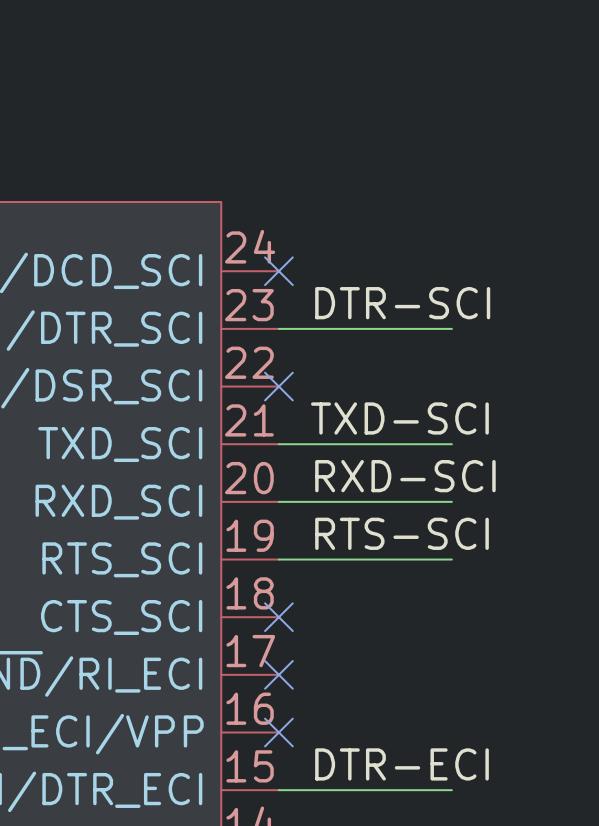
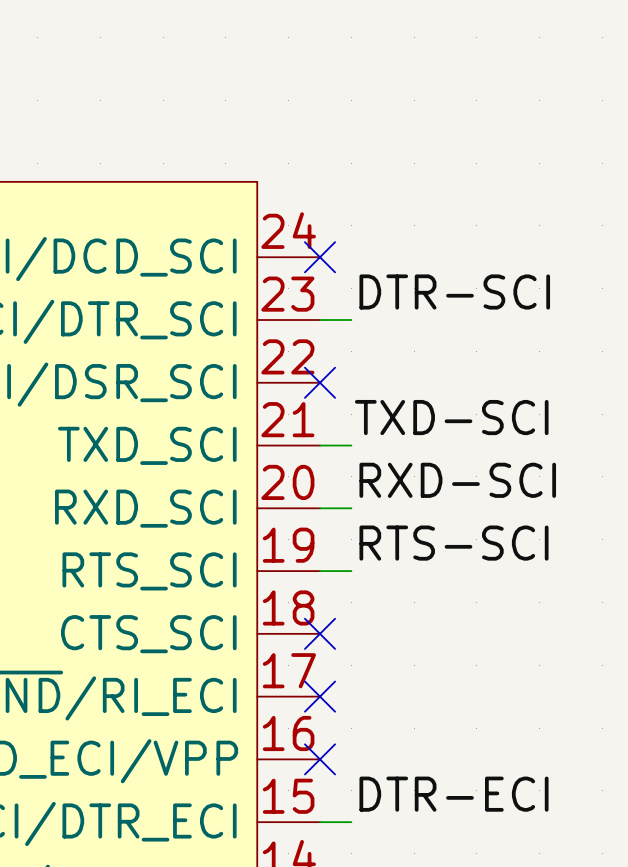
wire: (307, 328) (451, 328) -> none
wire: (307, 444) (451, 444) -> none
wire: (307, 501) (451, 501) -> none
wire: (307, 559) (451, 559) -> none
wire: (307, 790) (451, 790) -> none

